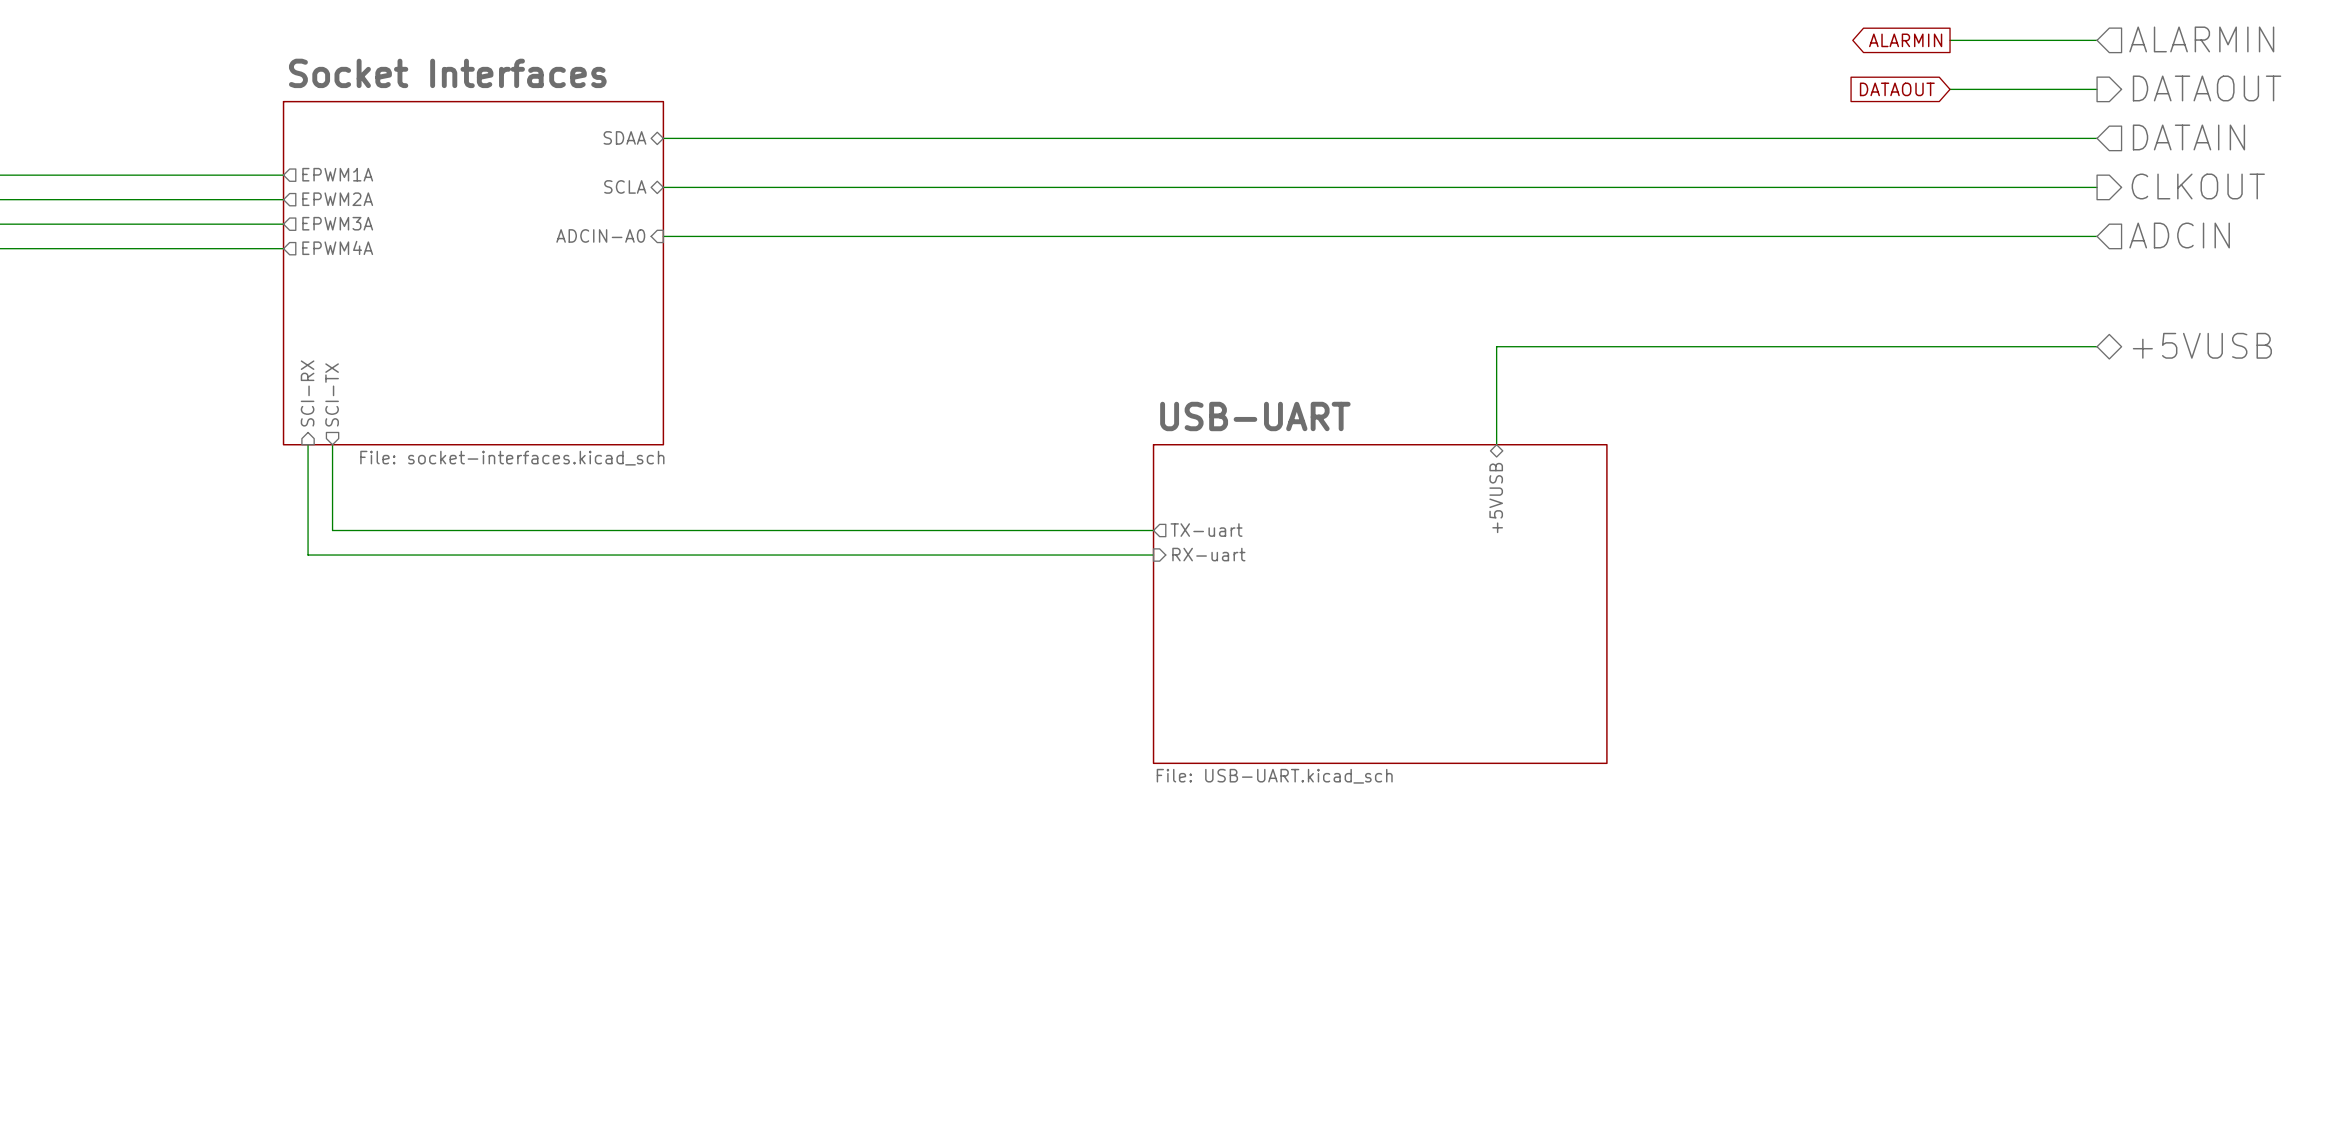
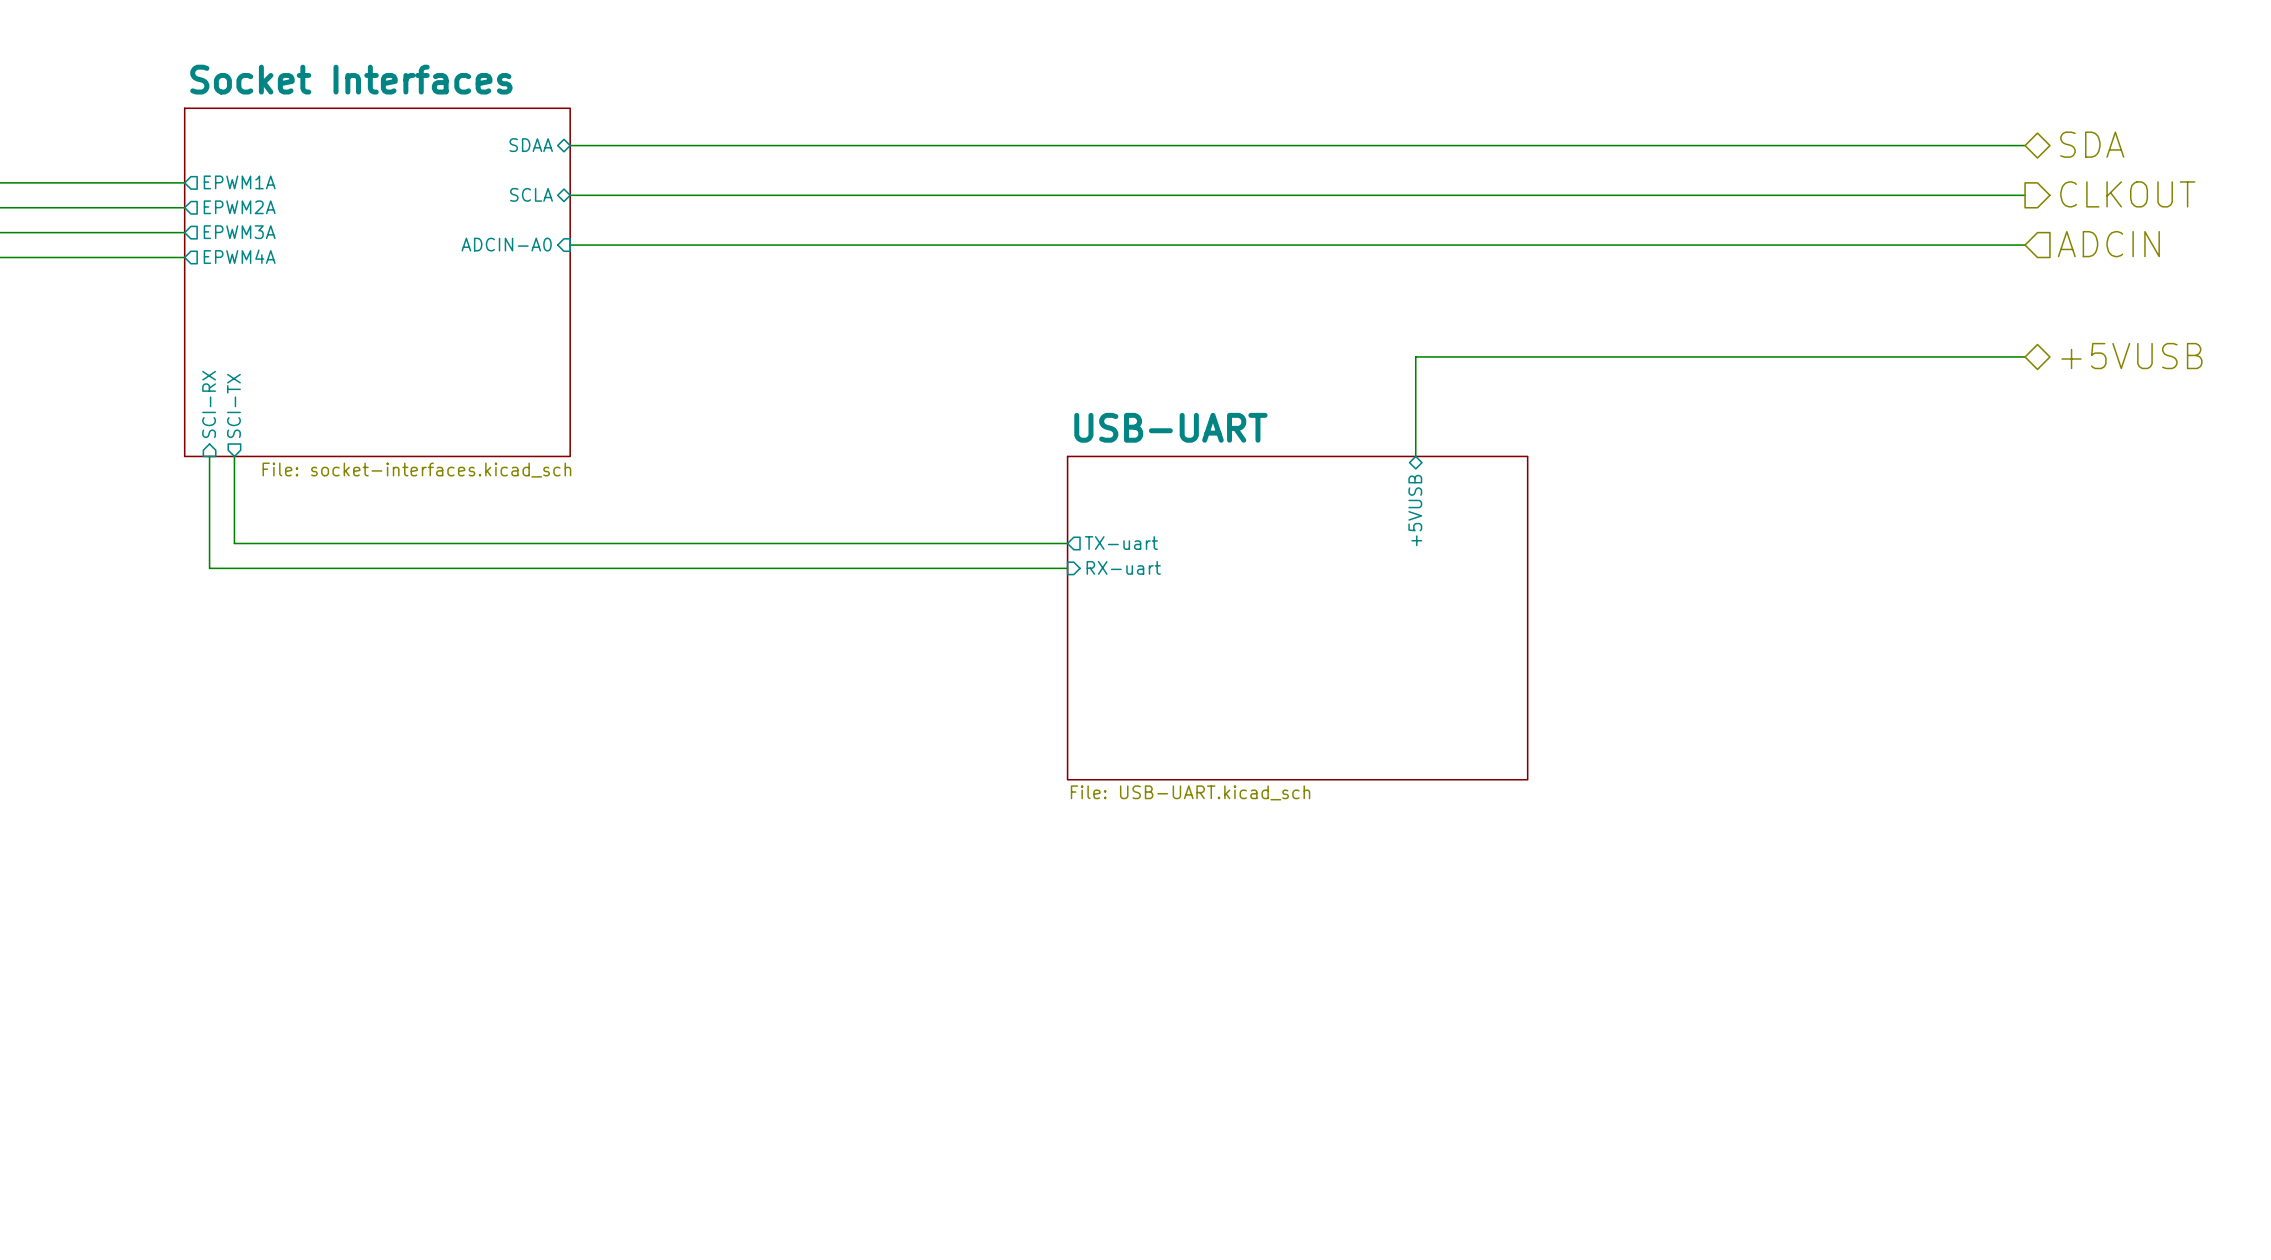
hierarchical label: ALARMIN (2201, 39) -> none
global label: ALARMIN (1905, 40) -> none
wire: (1950, 40) (2097, 40) -> none
hierarchical label: DATAOUT (2207, 88) -> none
global label: DATAOUT (1897, 89) -> none
wire: (1950, 89) (2097, 89) -> none
hierarchical label shape: input (2188, 137) -> bidirectional (2092, 144)
hierarchical label: DATAIN (2188, 137) -> SDA (2092, 144)

